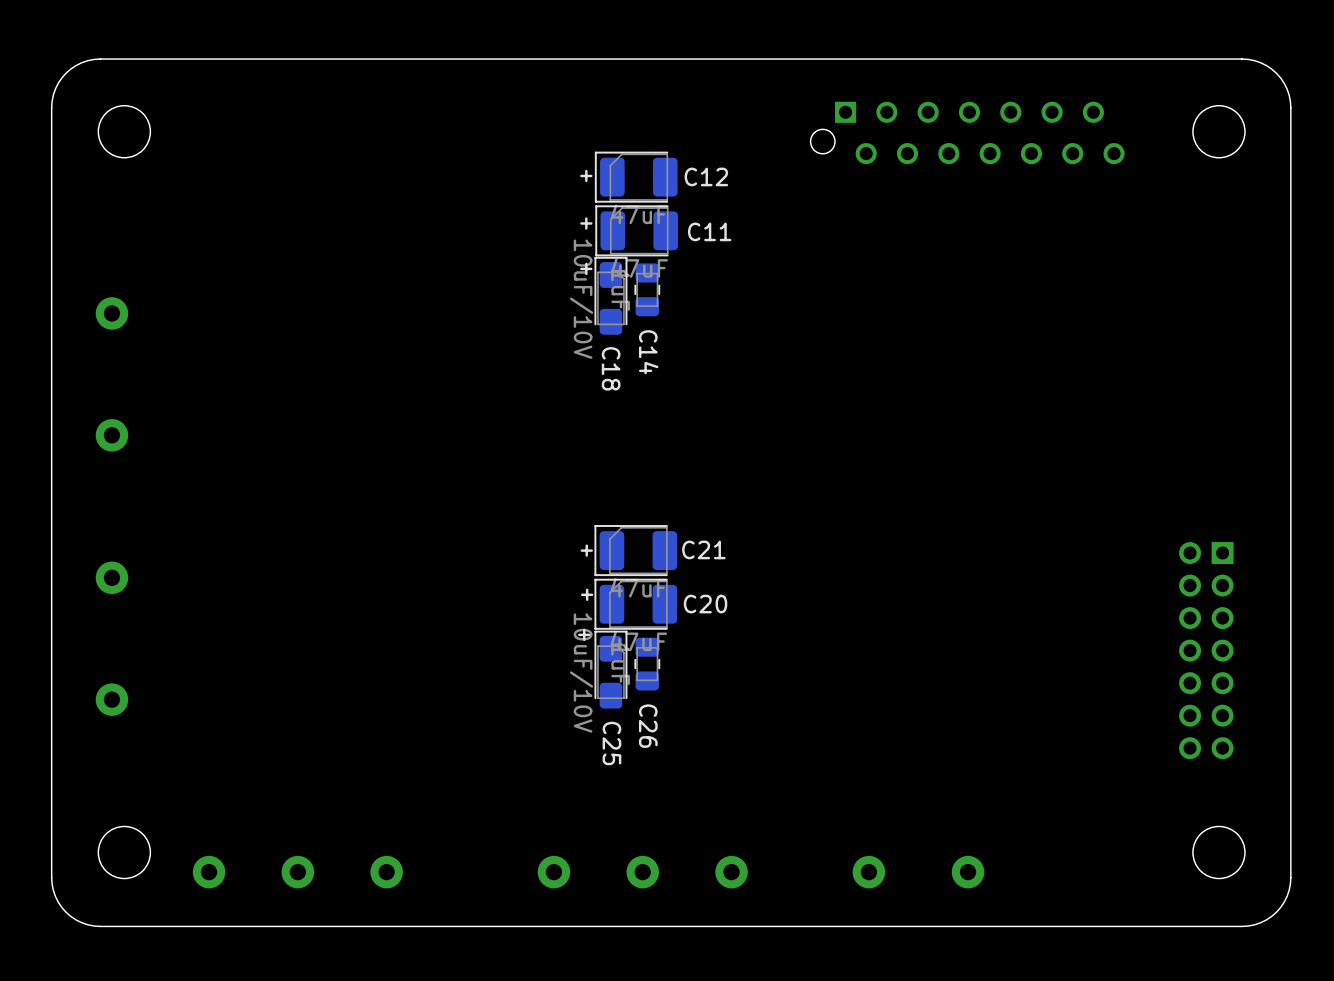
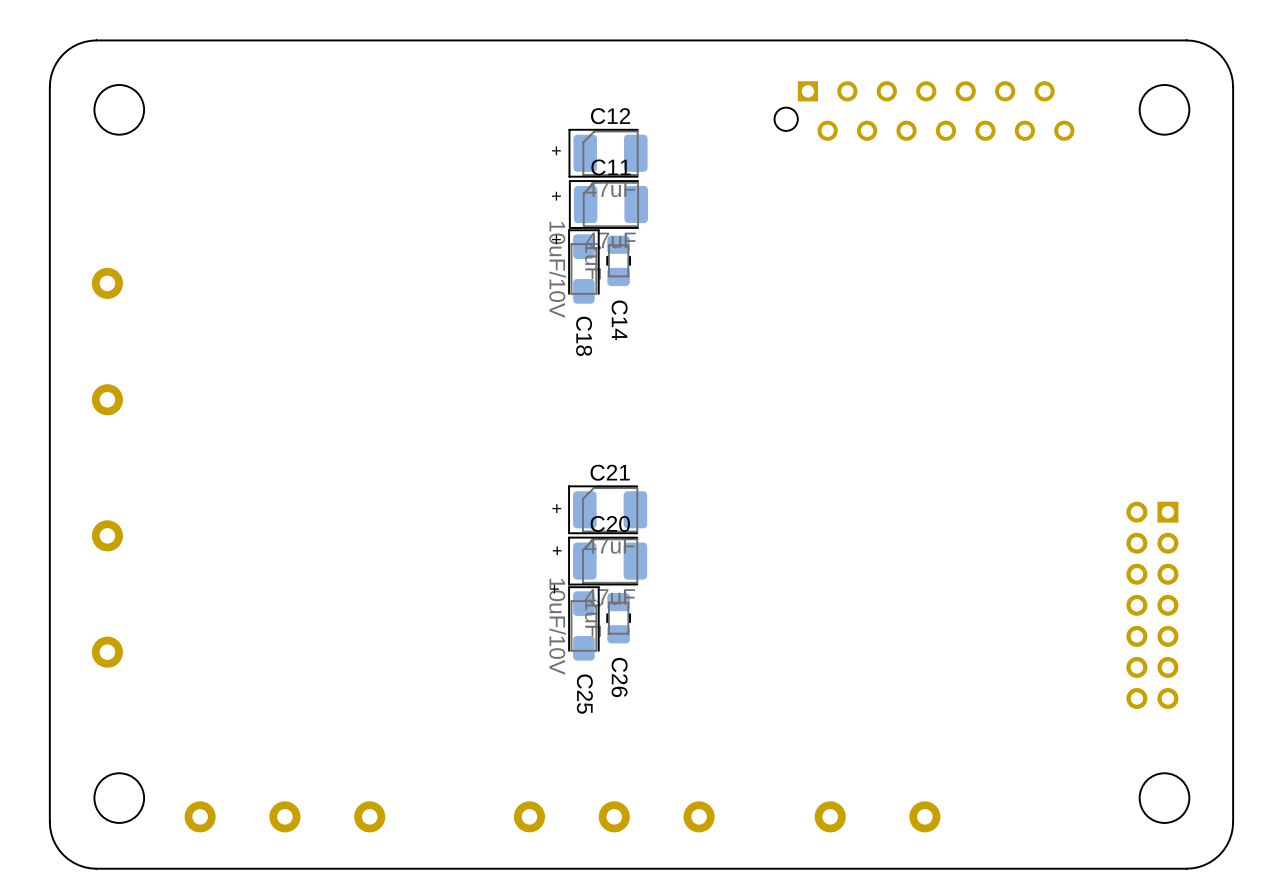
C12 name position: C12 (706, 176) -> C12 (610, 116)
C11 name position: C11 (709, 231) -> C11 (610, 167)
C21 name position: C21 (703, 549) -> C21 (610, 472)
C20 name position: C20 (705, 604) -> C20 (610, 523)

